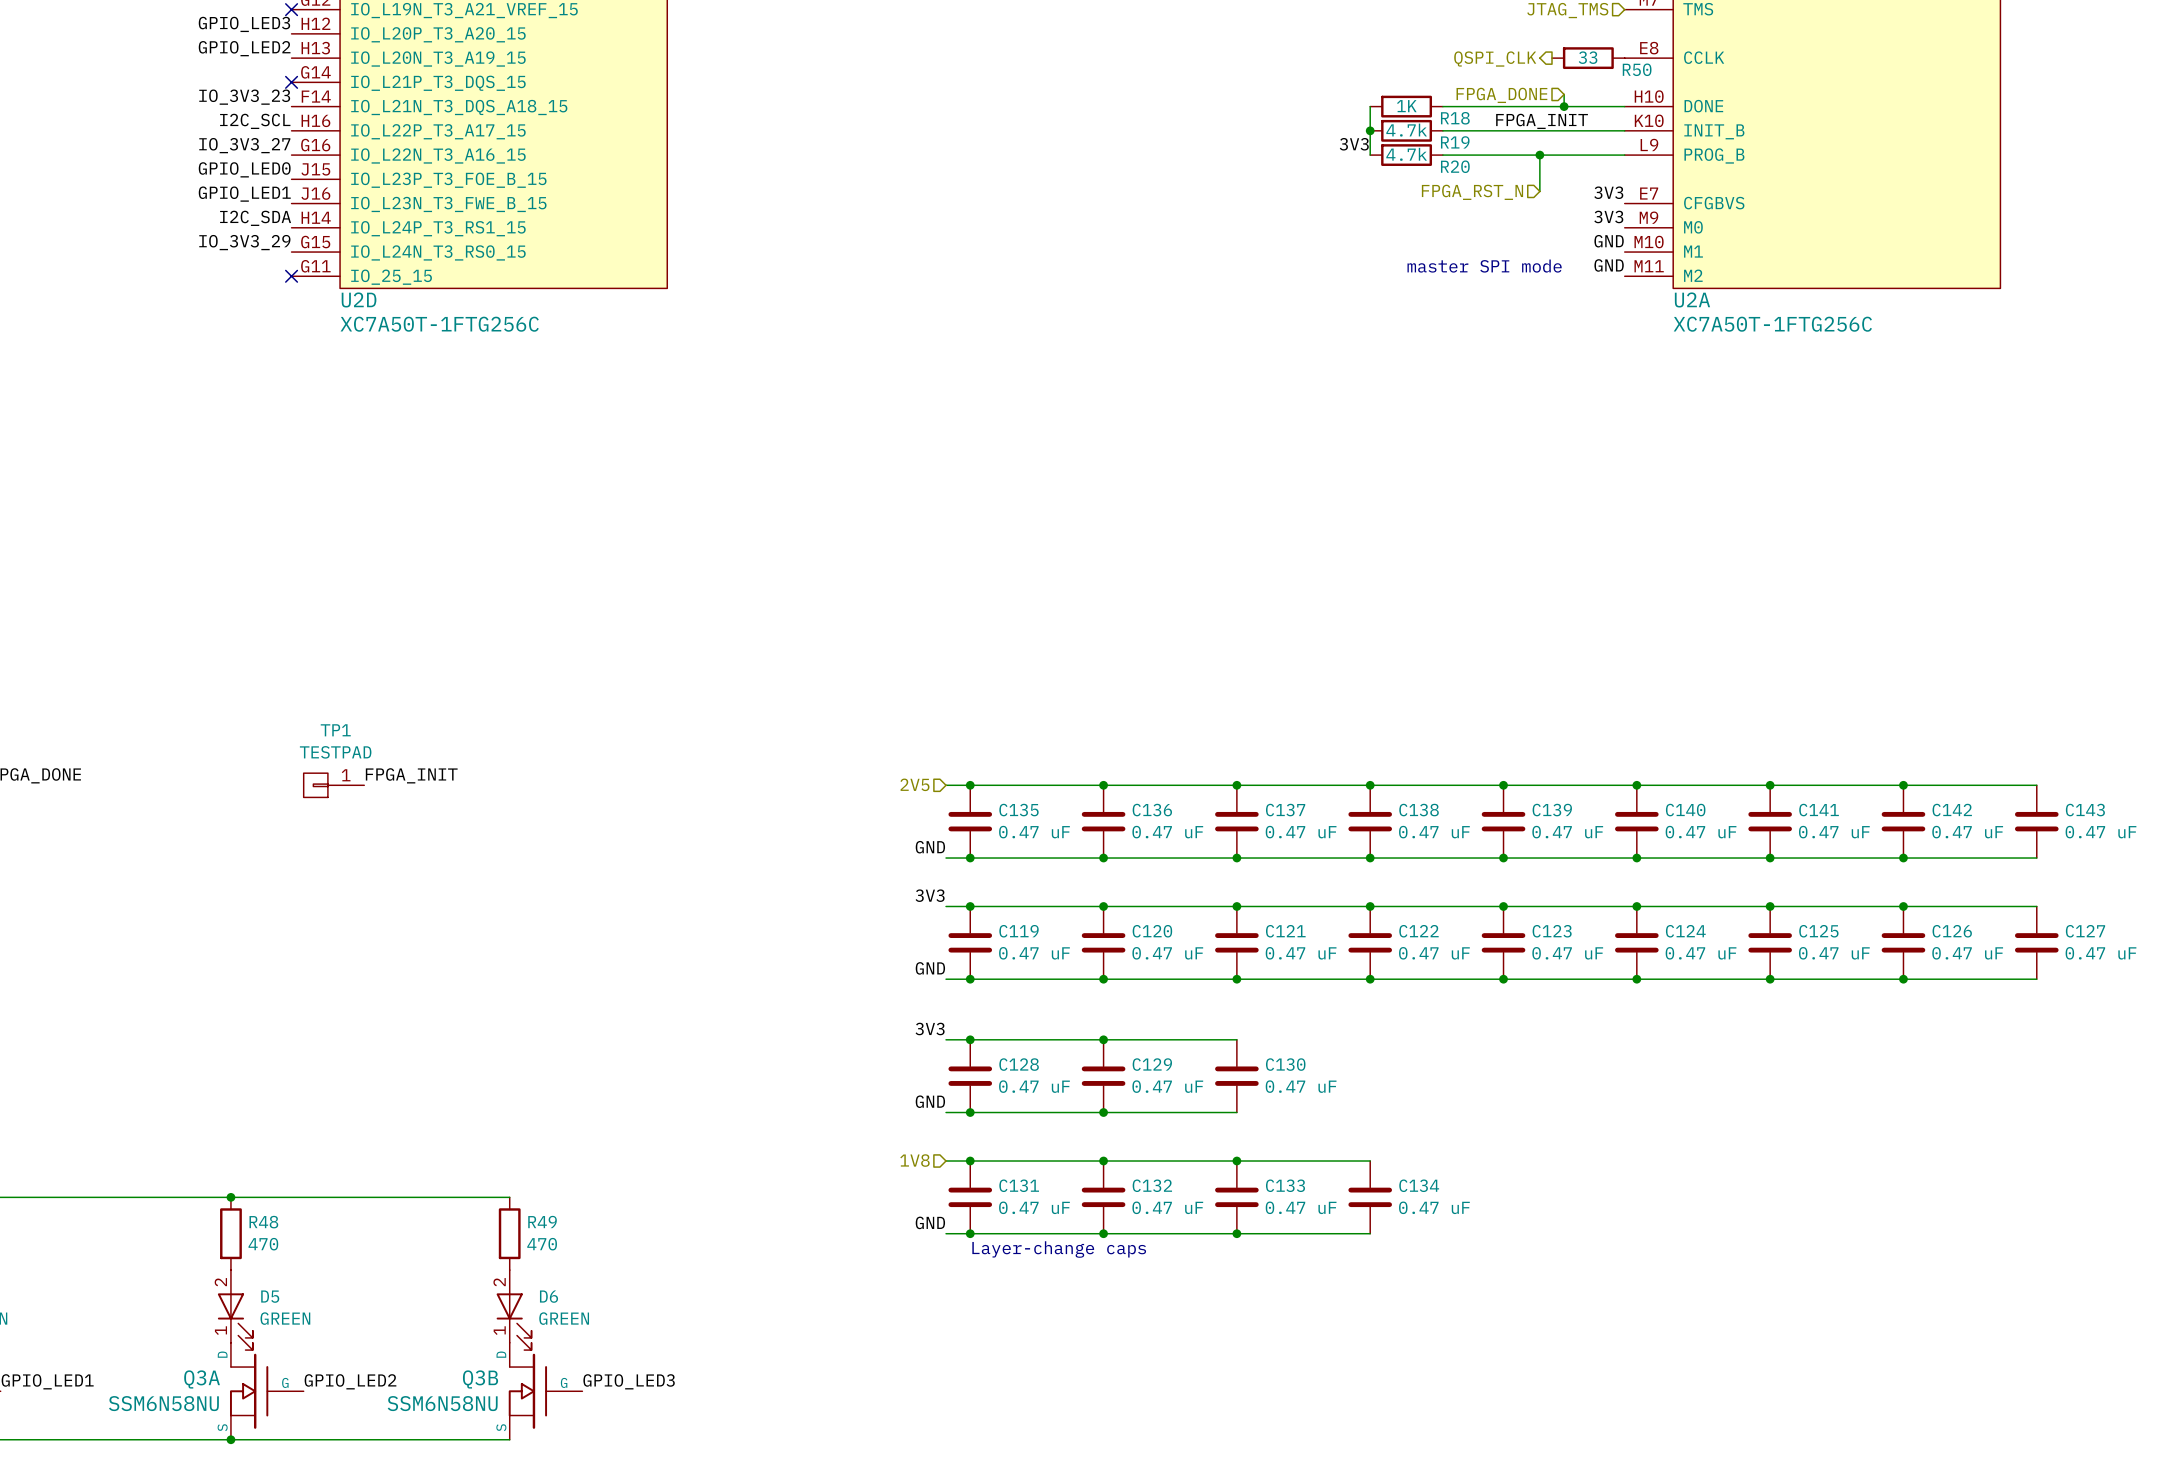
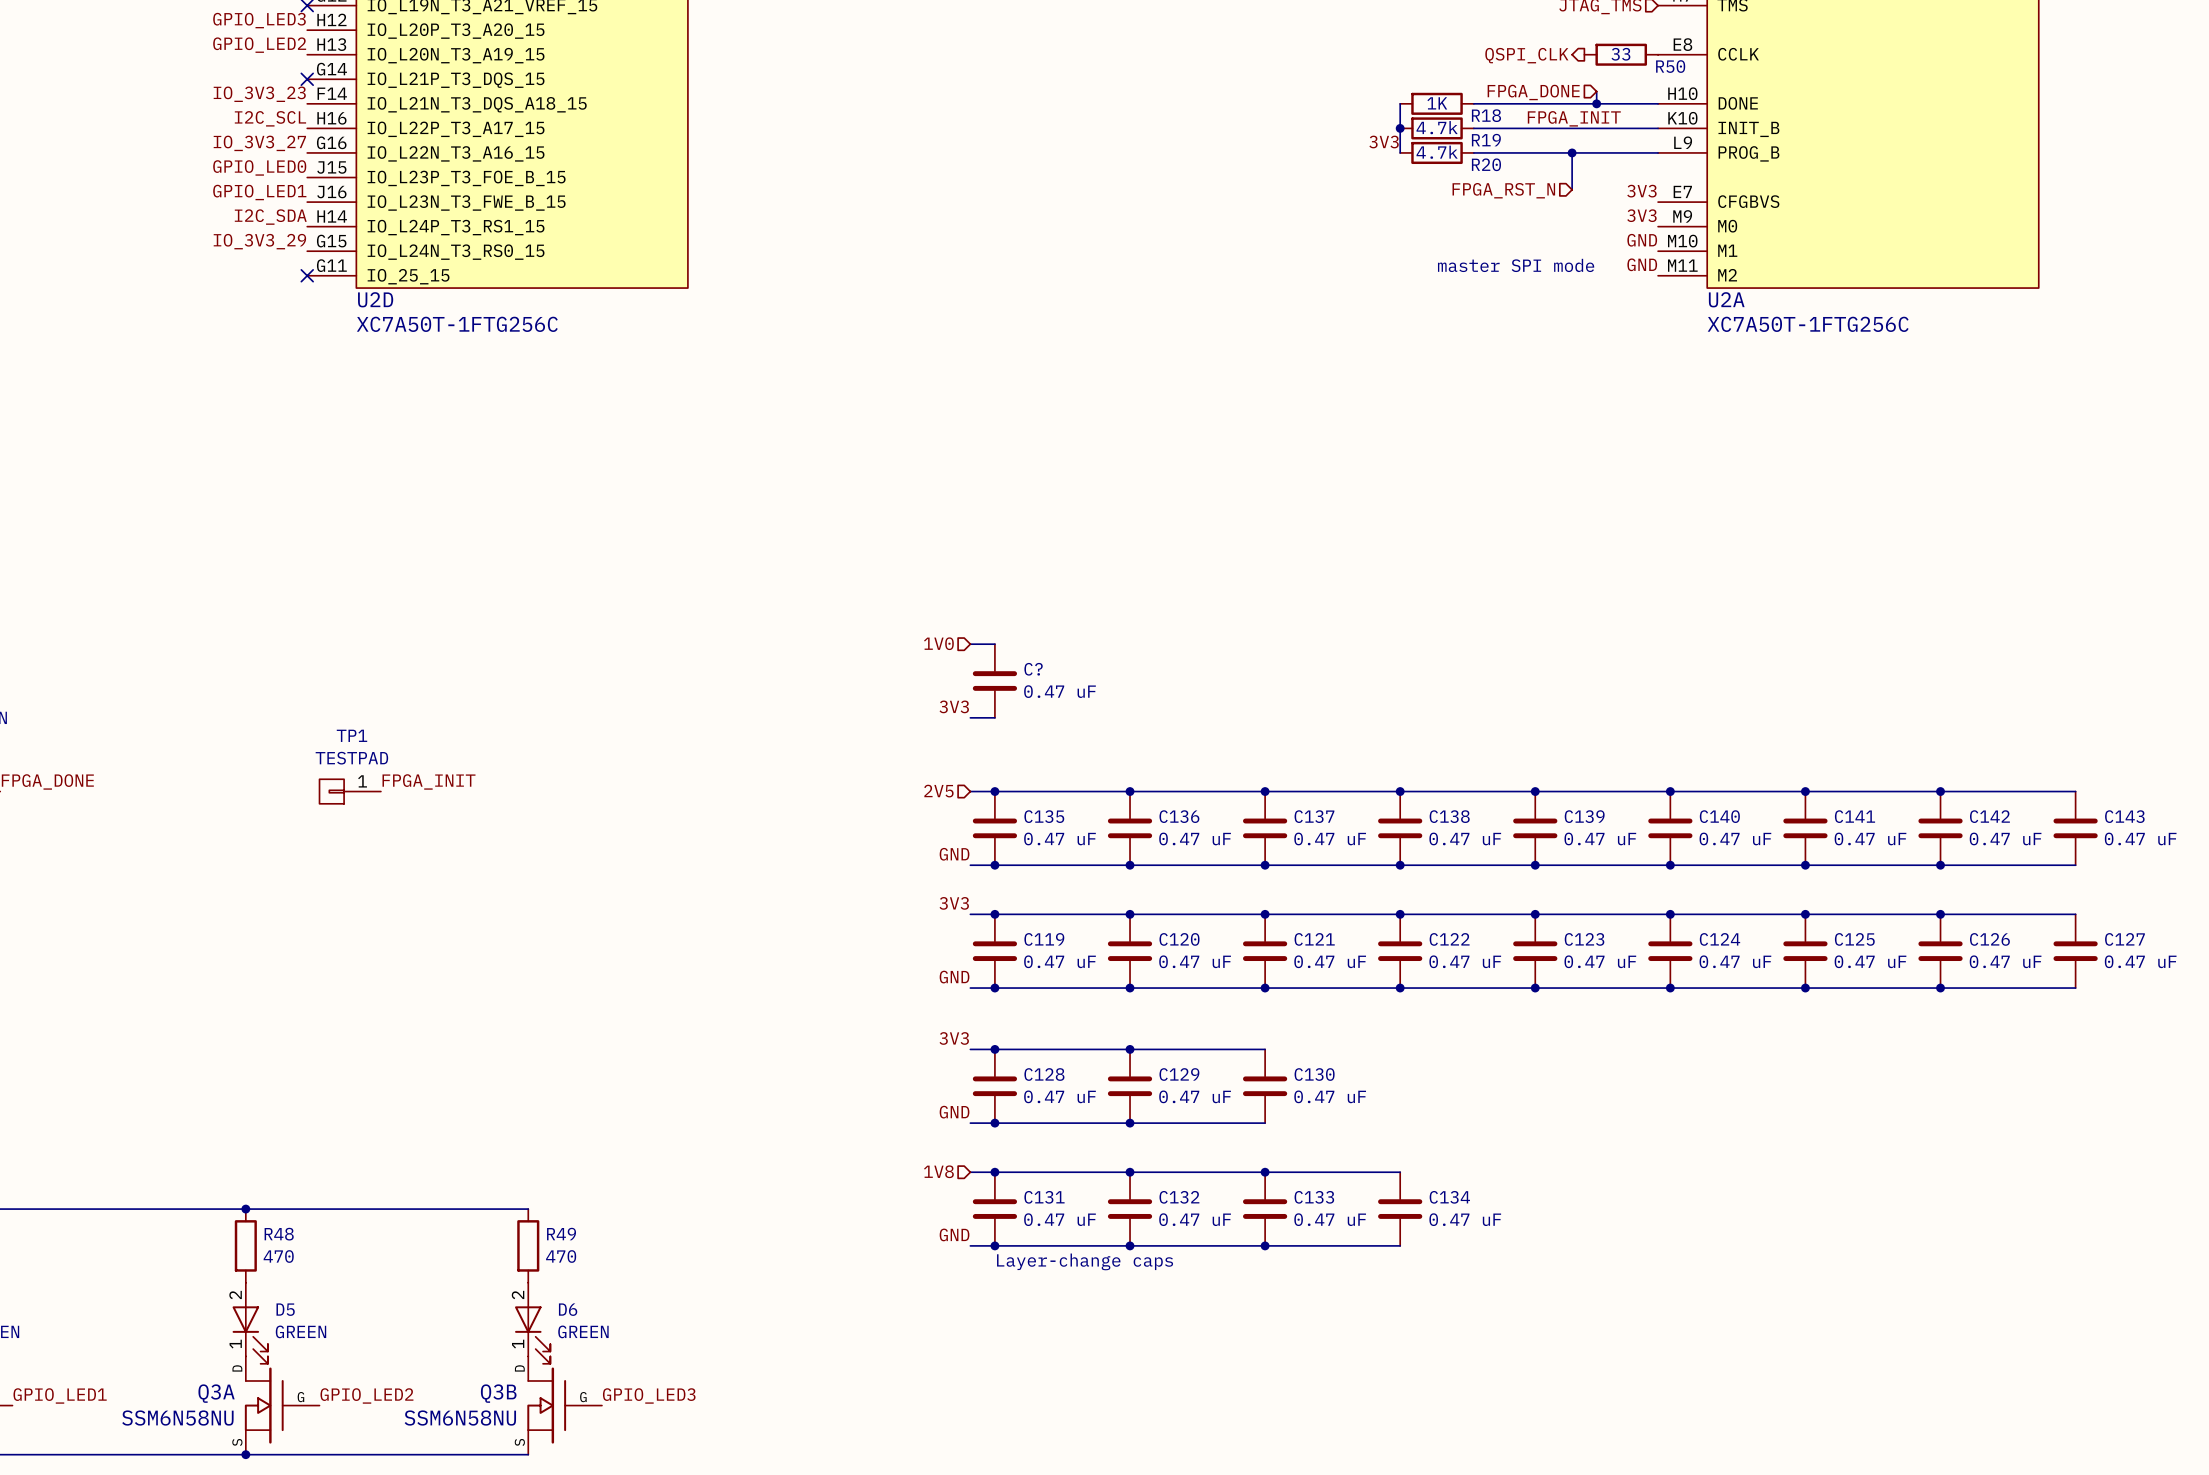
hierarchical label: none -> 1V0 (938, 643)
wire: none -> (970, 644) (994, 644)
C?: none -> 0.47 uF (994, 681)
label: none -> 3V3 (954, 706)
wire: none -> (970, 717) (994, 717)

